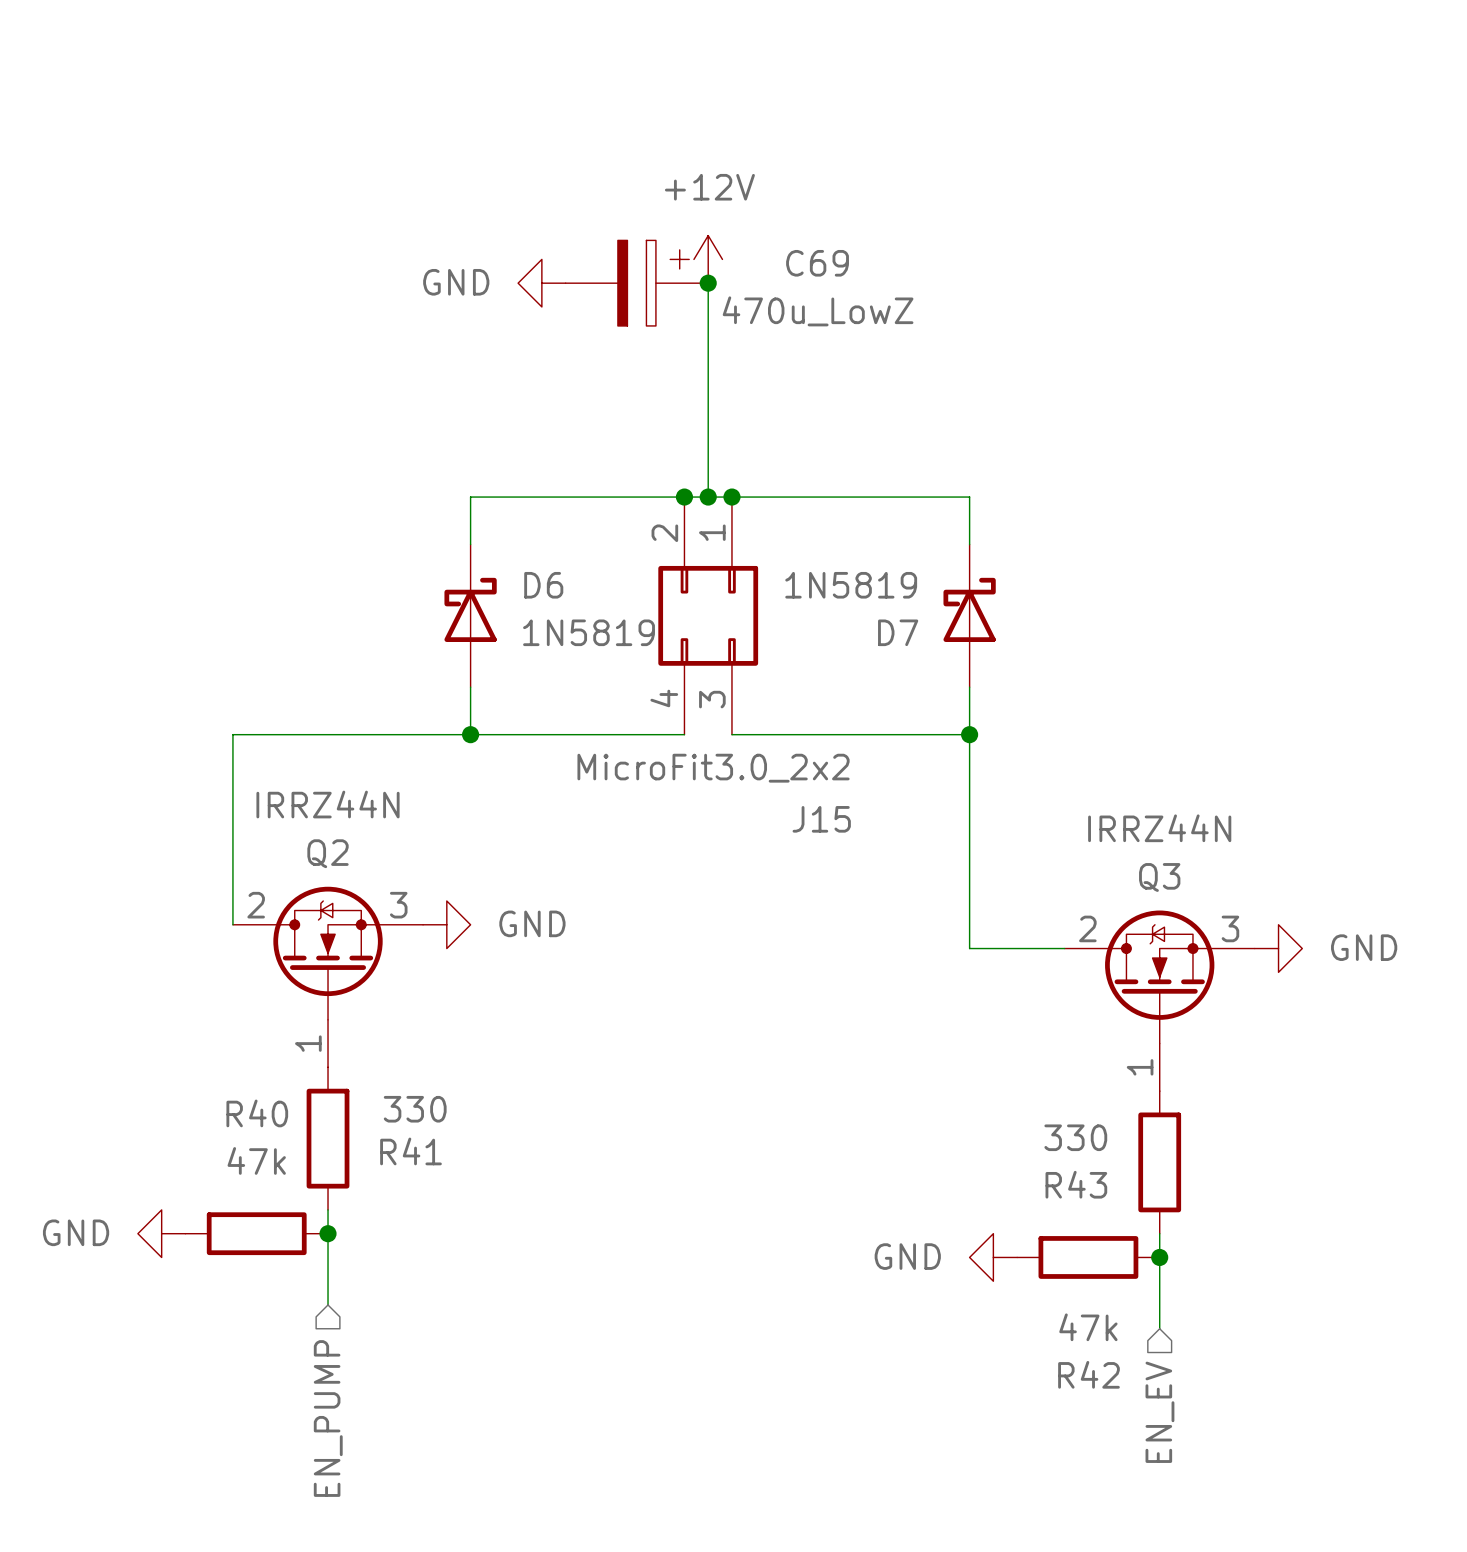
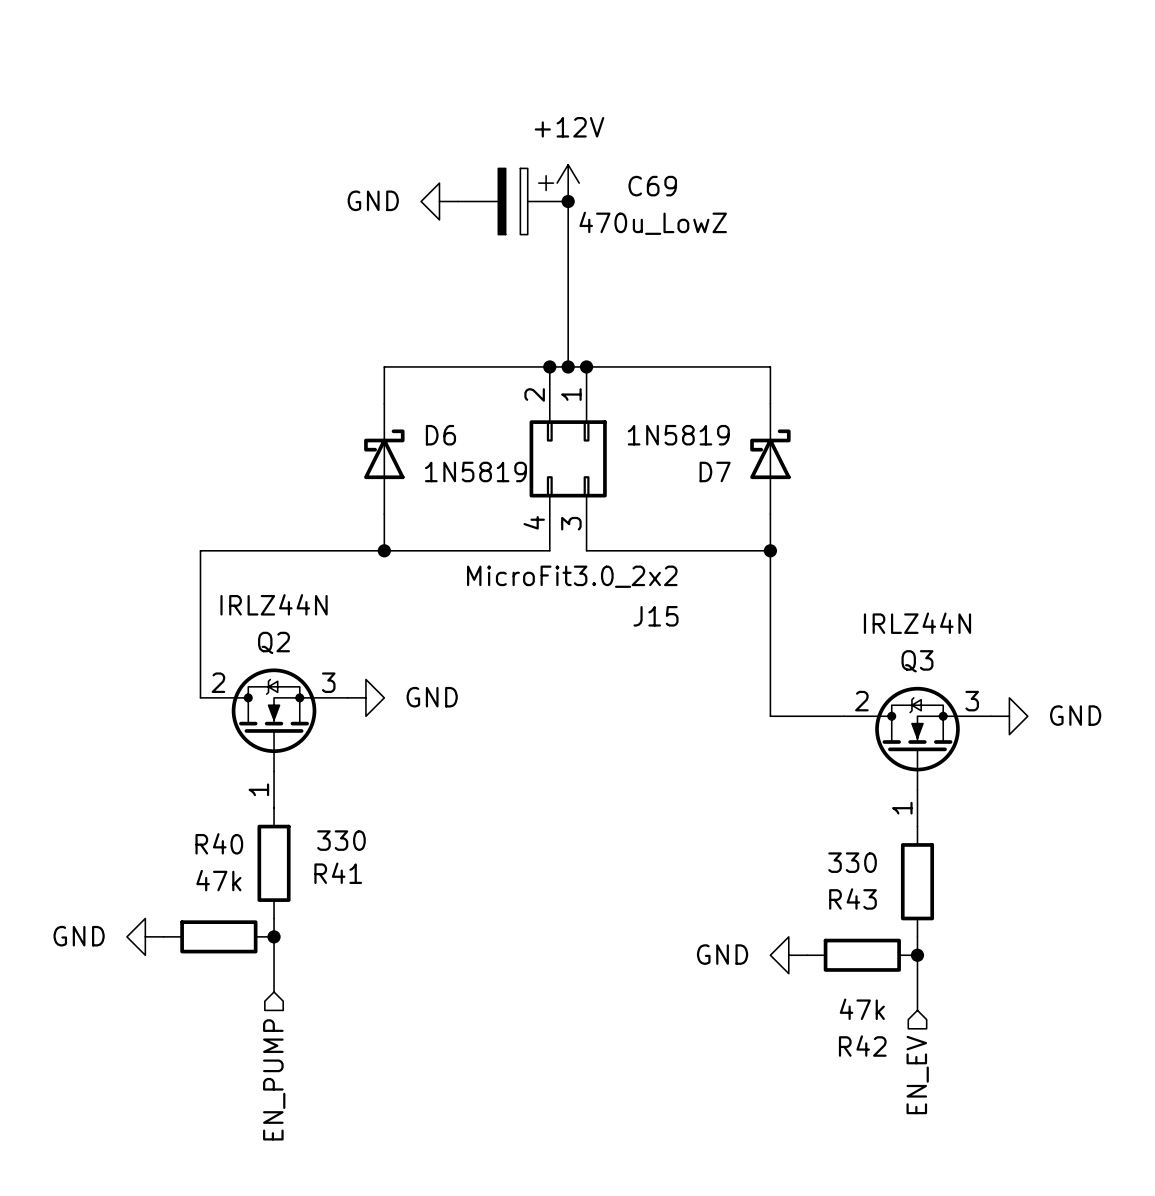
Q2 value: IRRZ44N (328, 804) -> IRLZ44N (274, 604)
Q3 value: IRRZ44N (1159, 828) -> IRLZ44N (917, 623)

